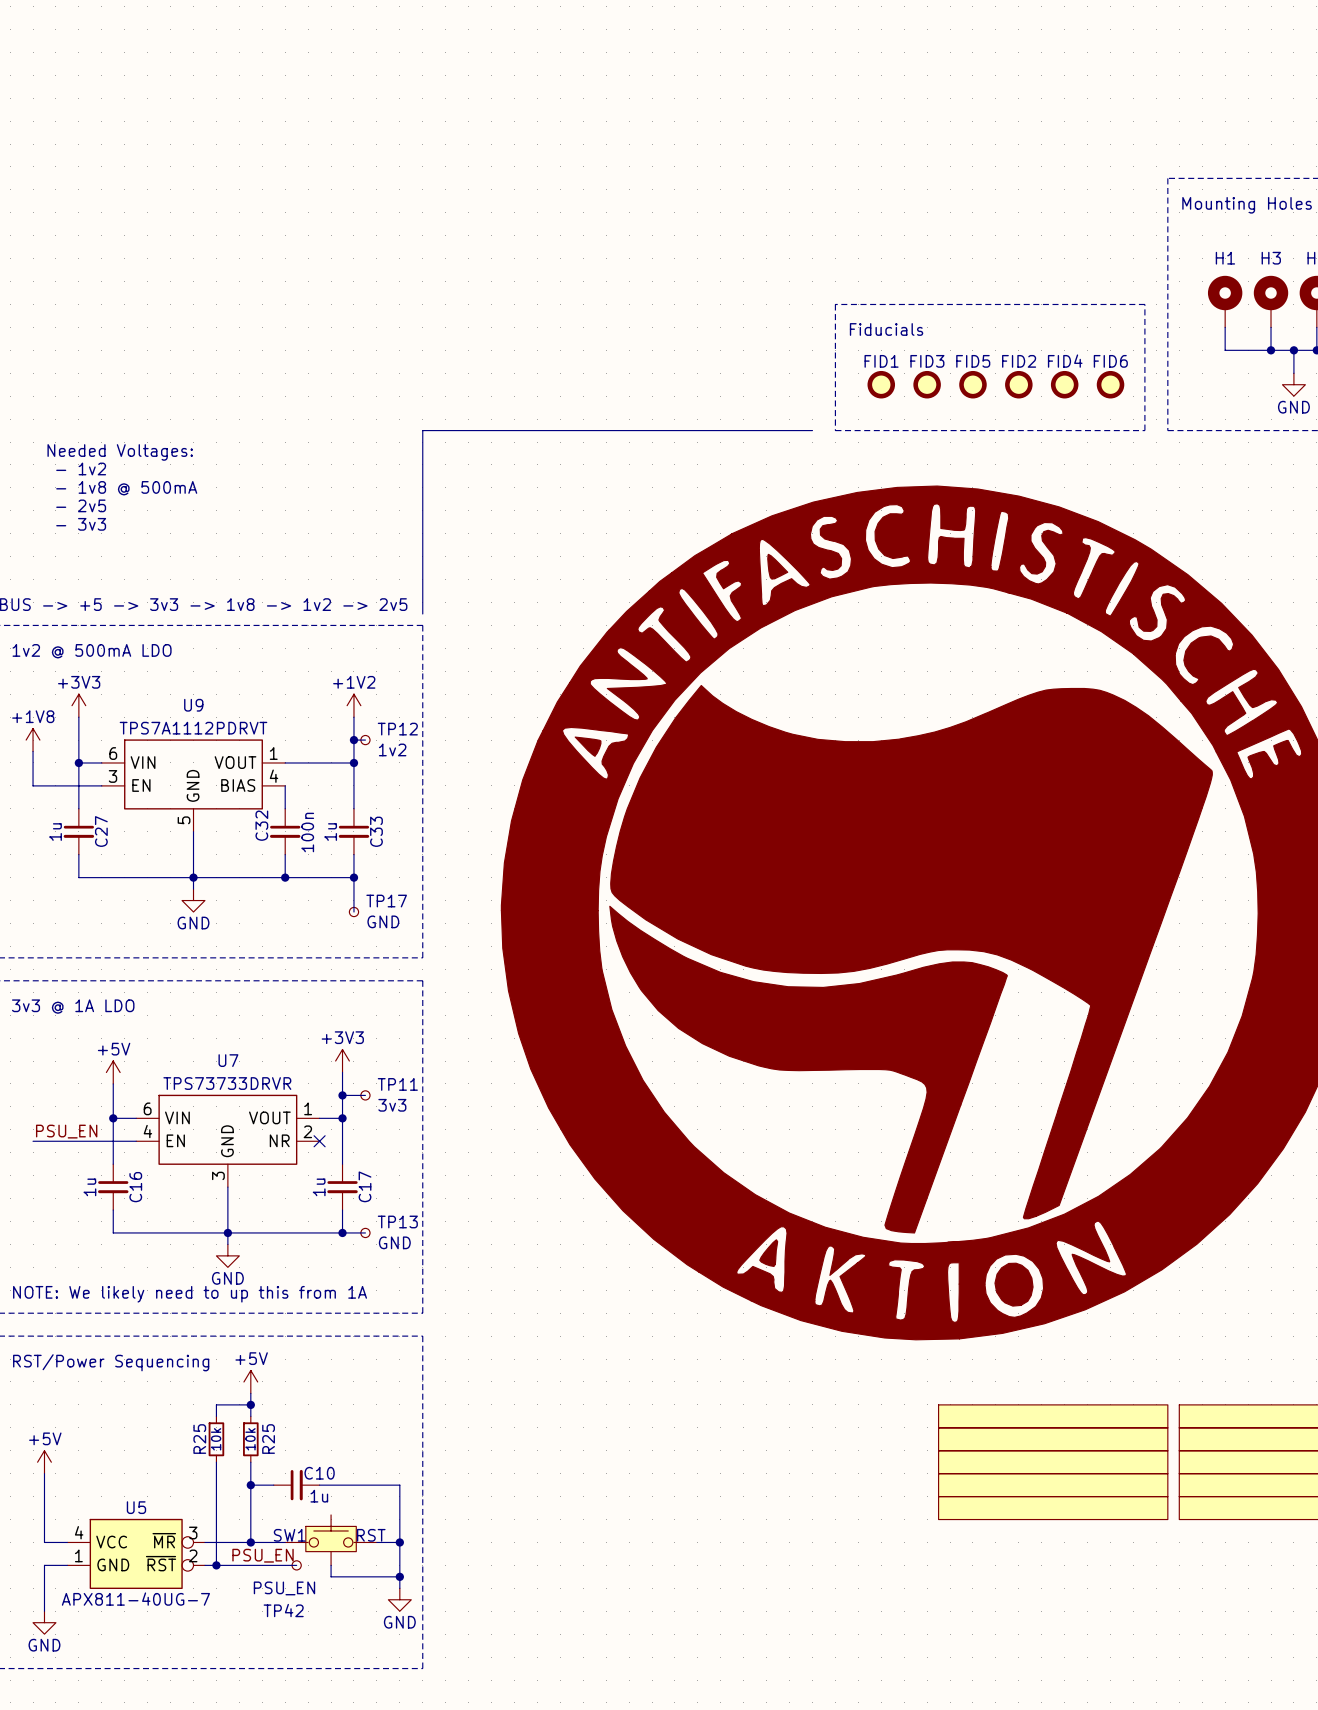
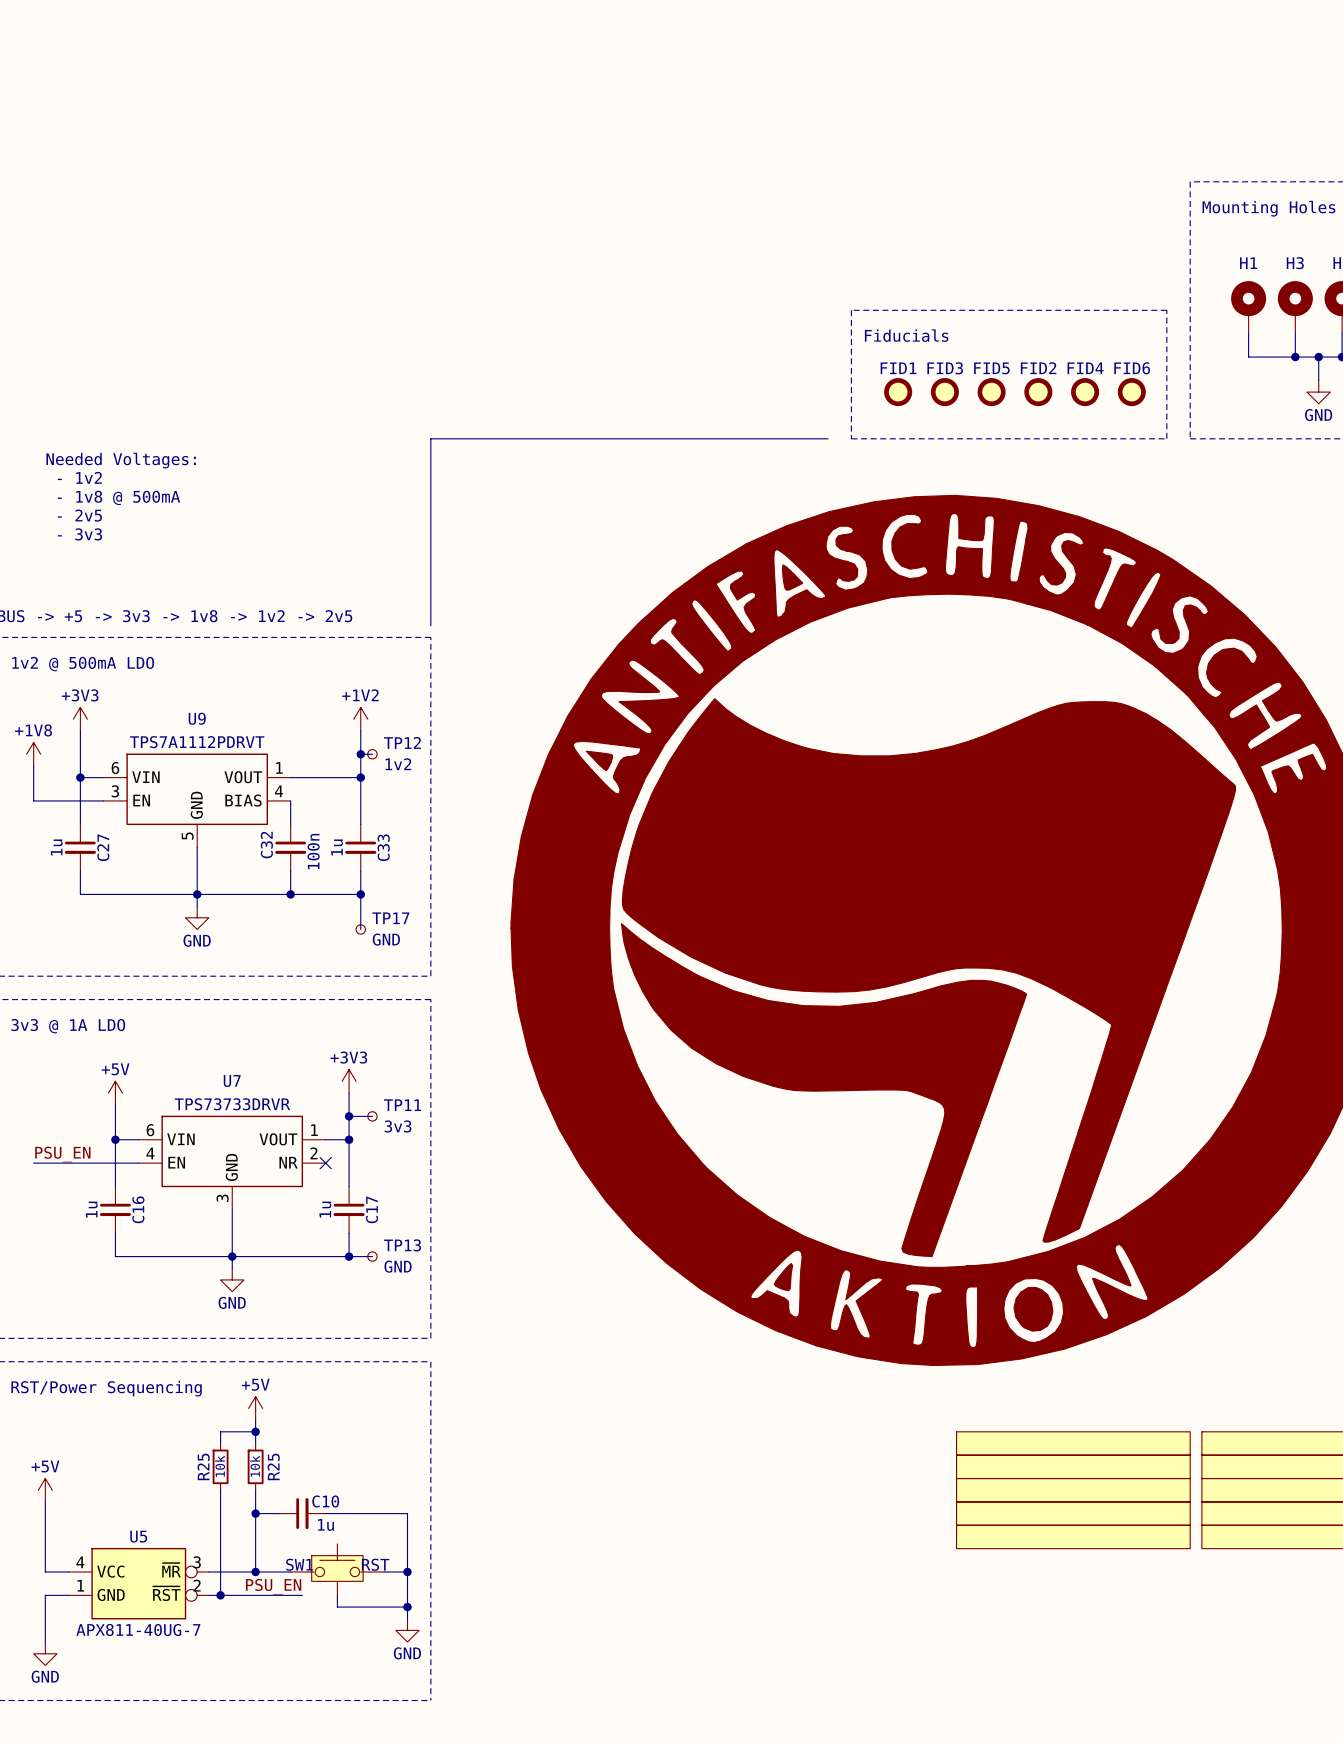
text: NOTE: We likely need to up this from 1A (190, 1294) -> none
TP42: PSU_EN (296, 1565) -> none

